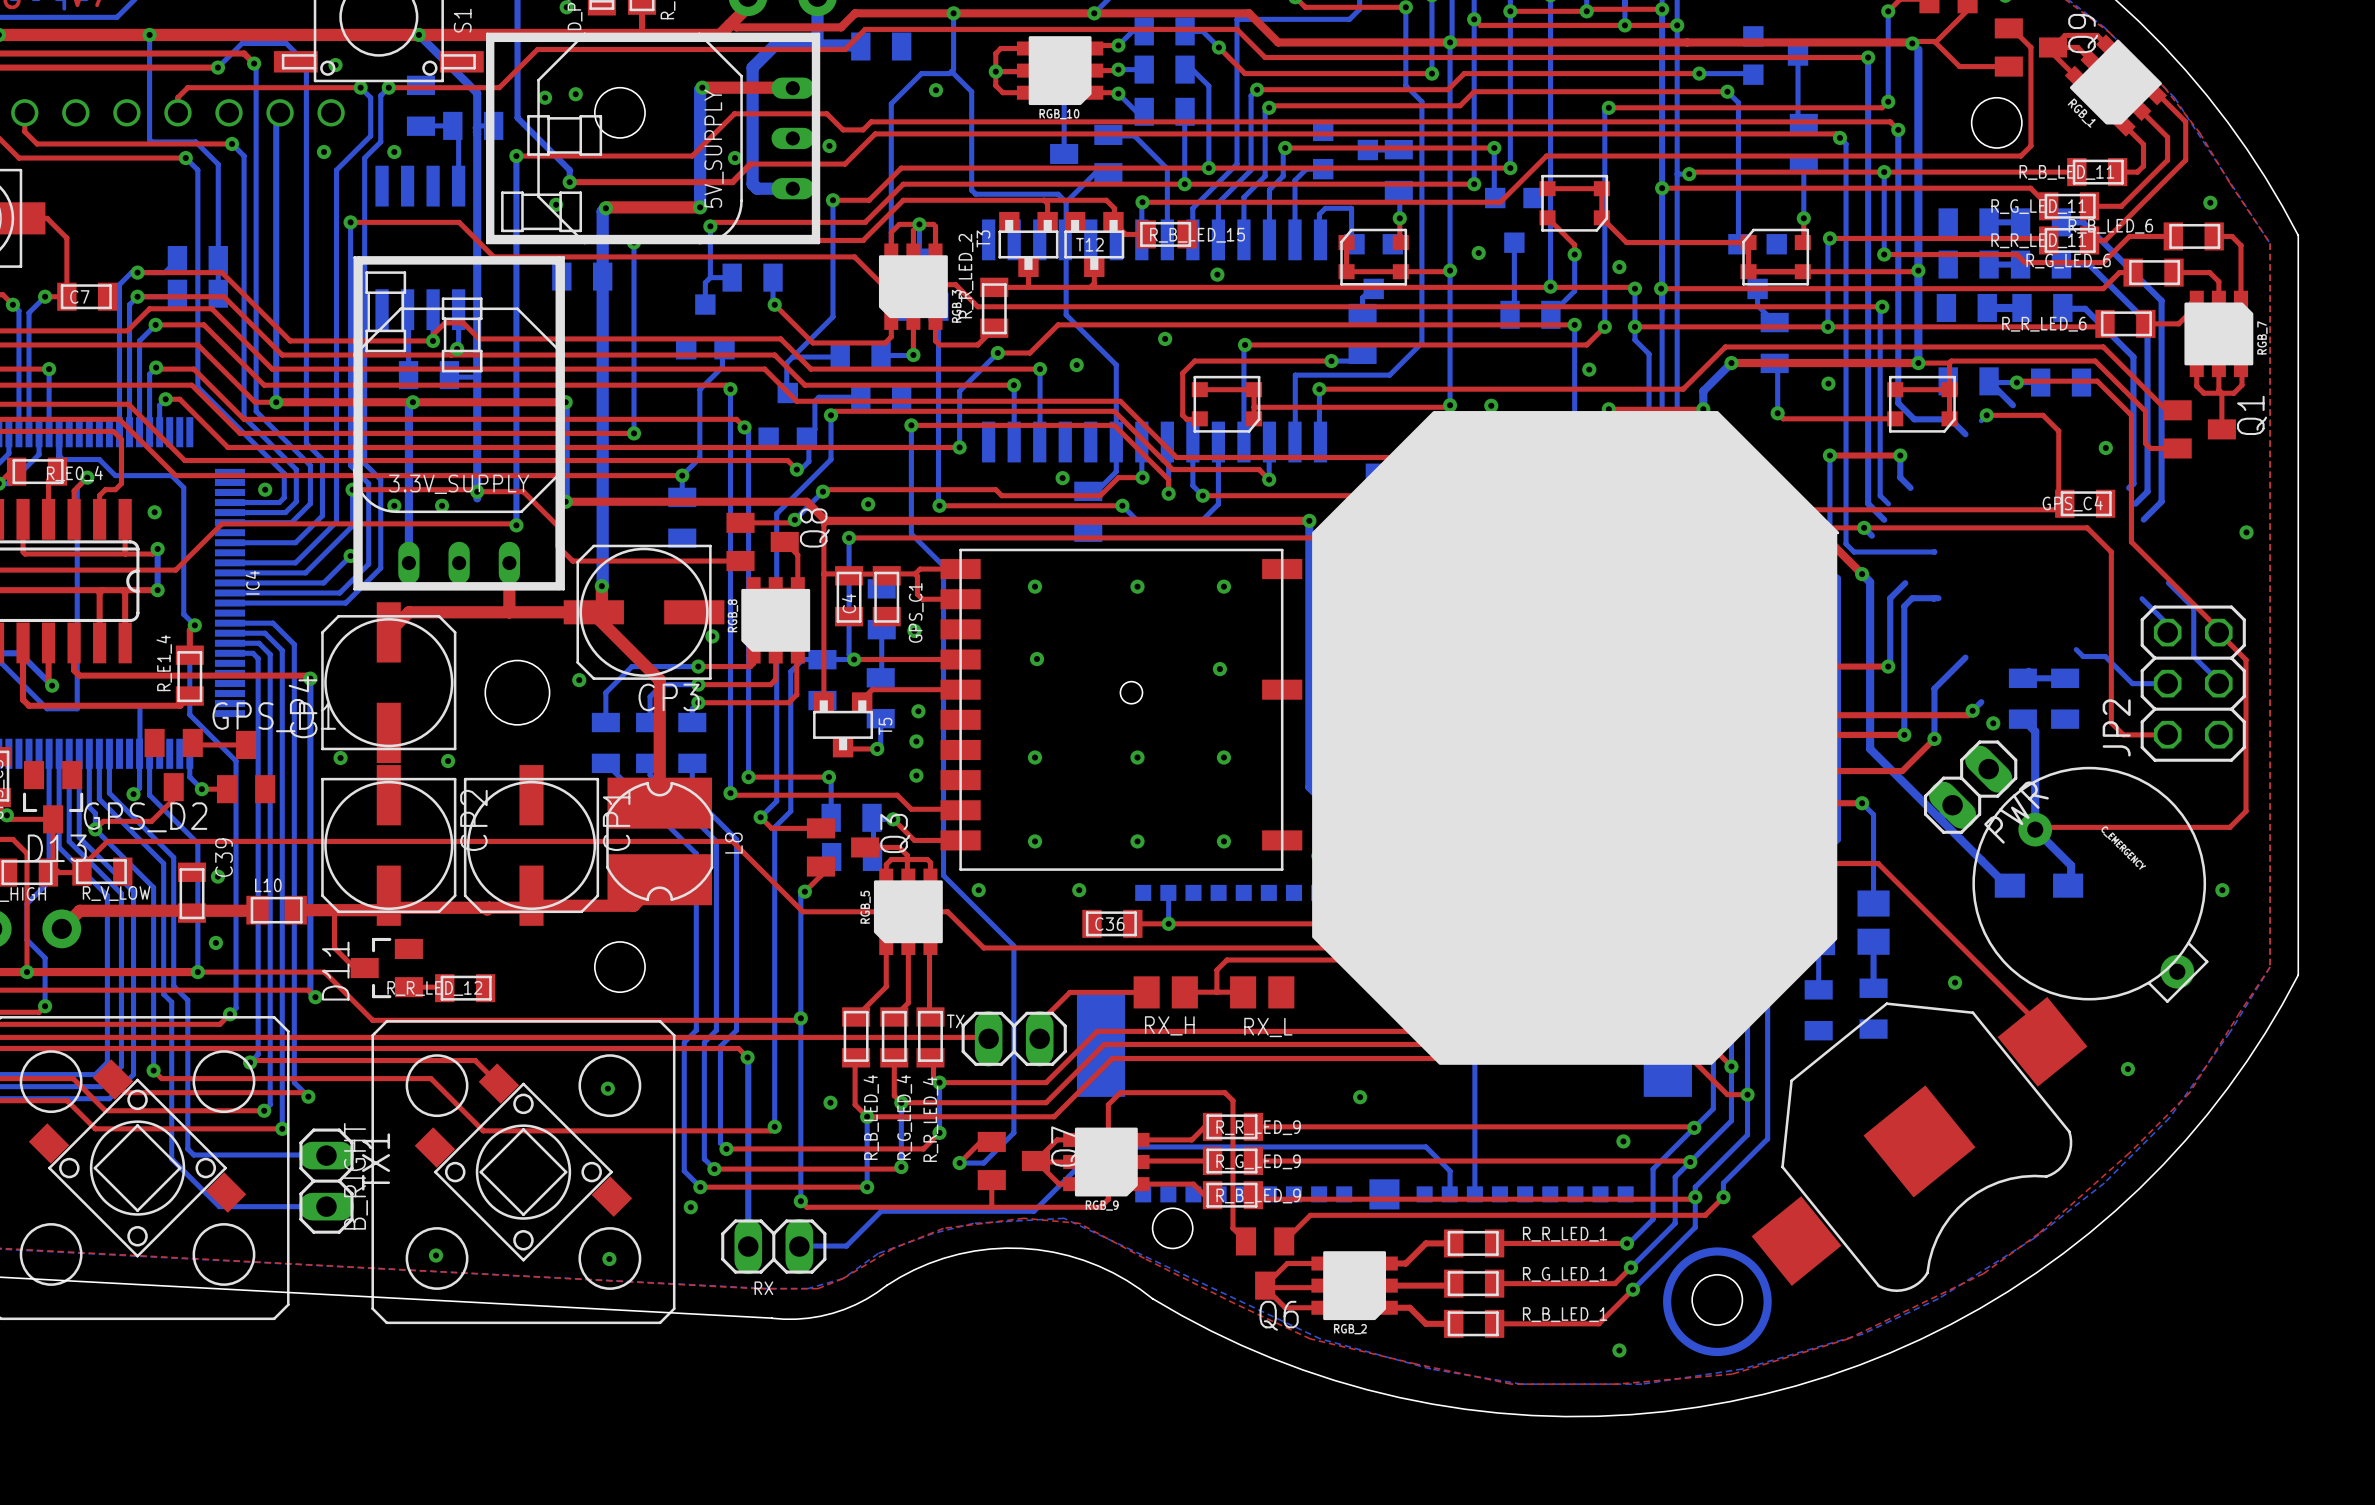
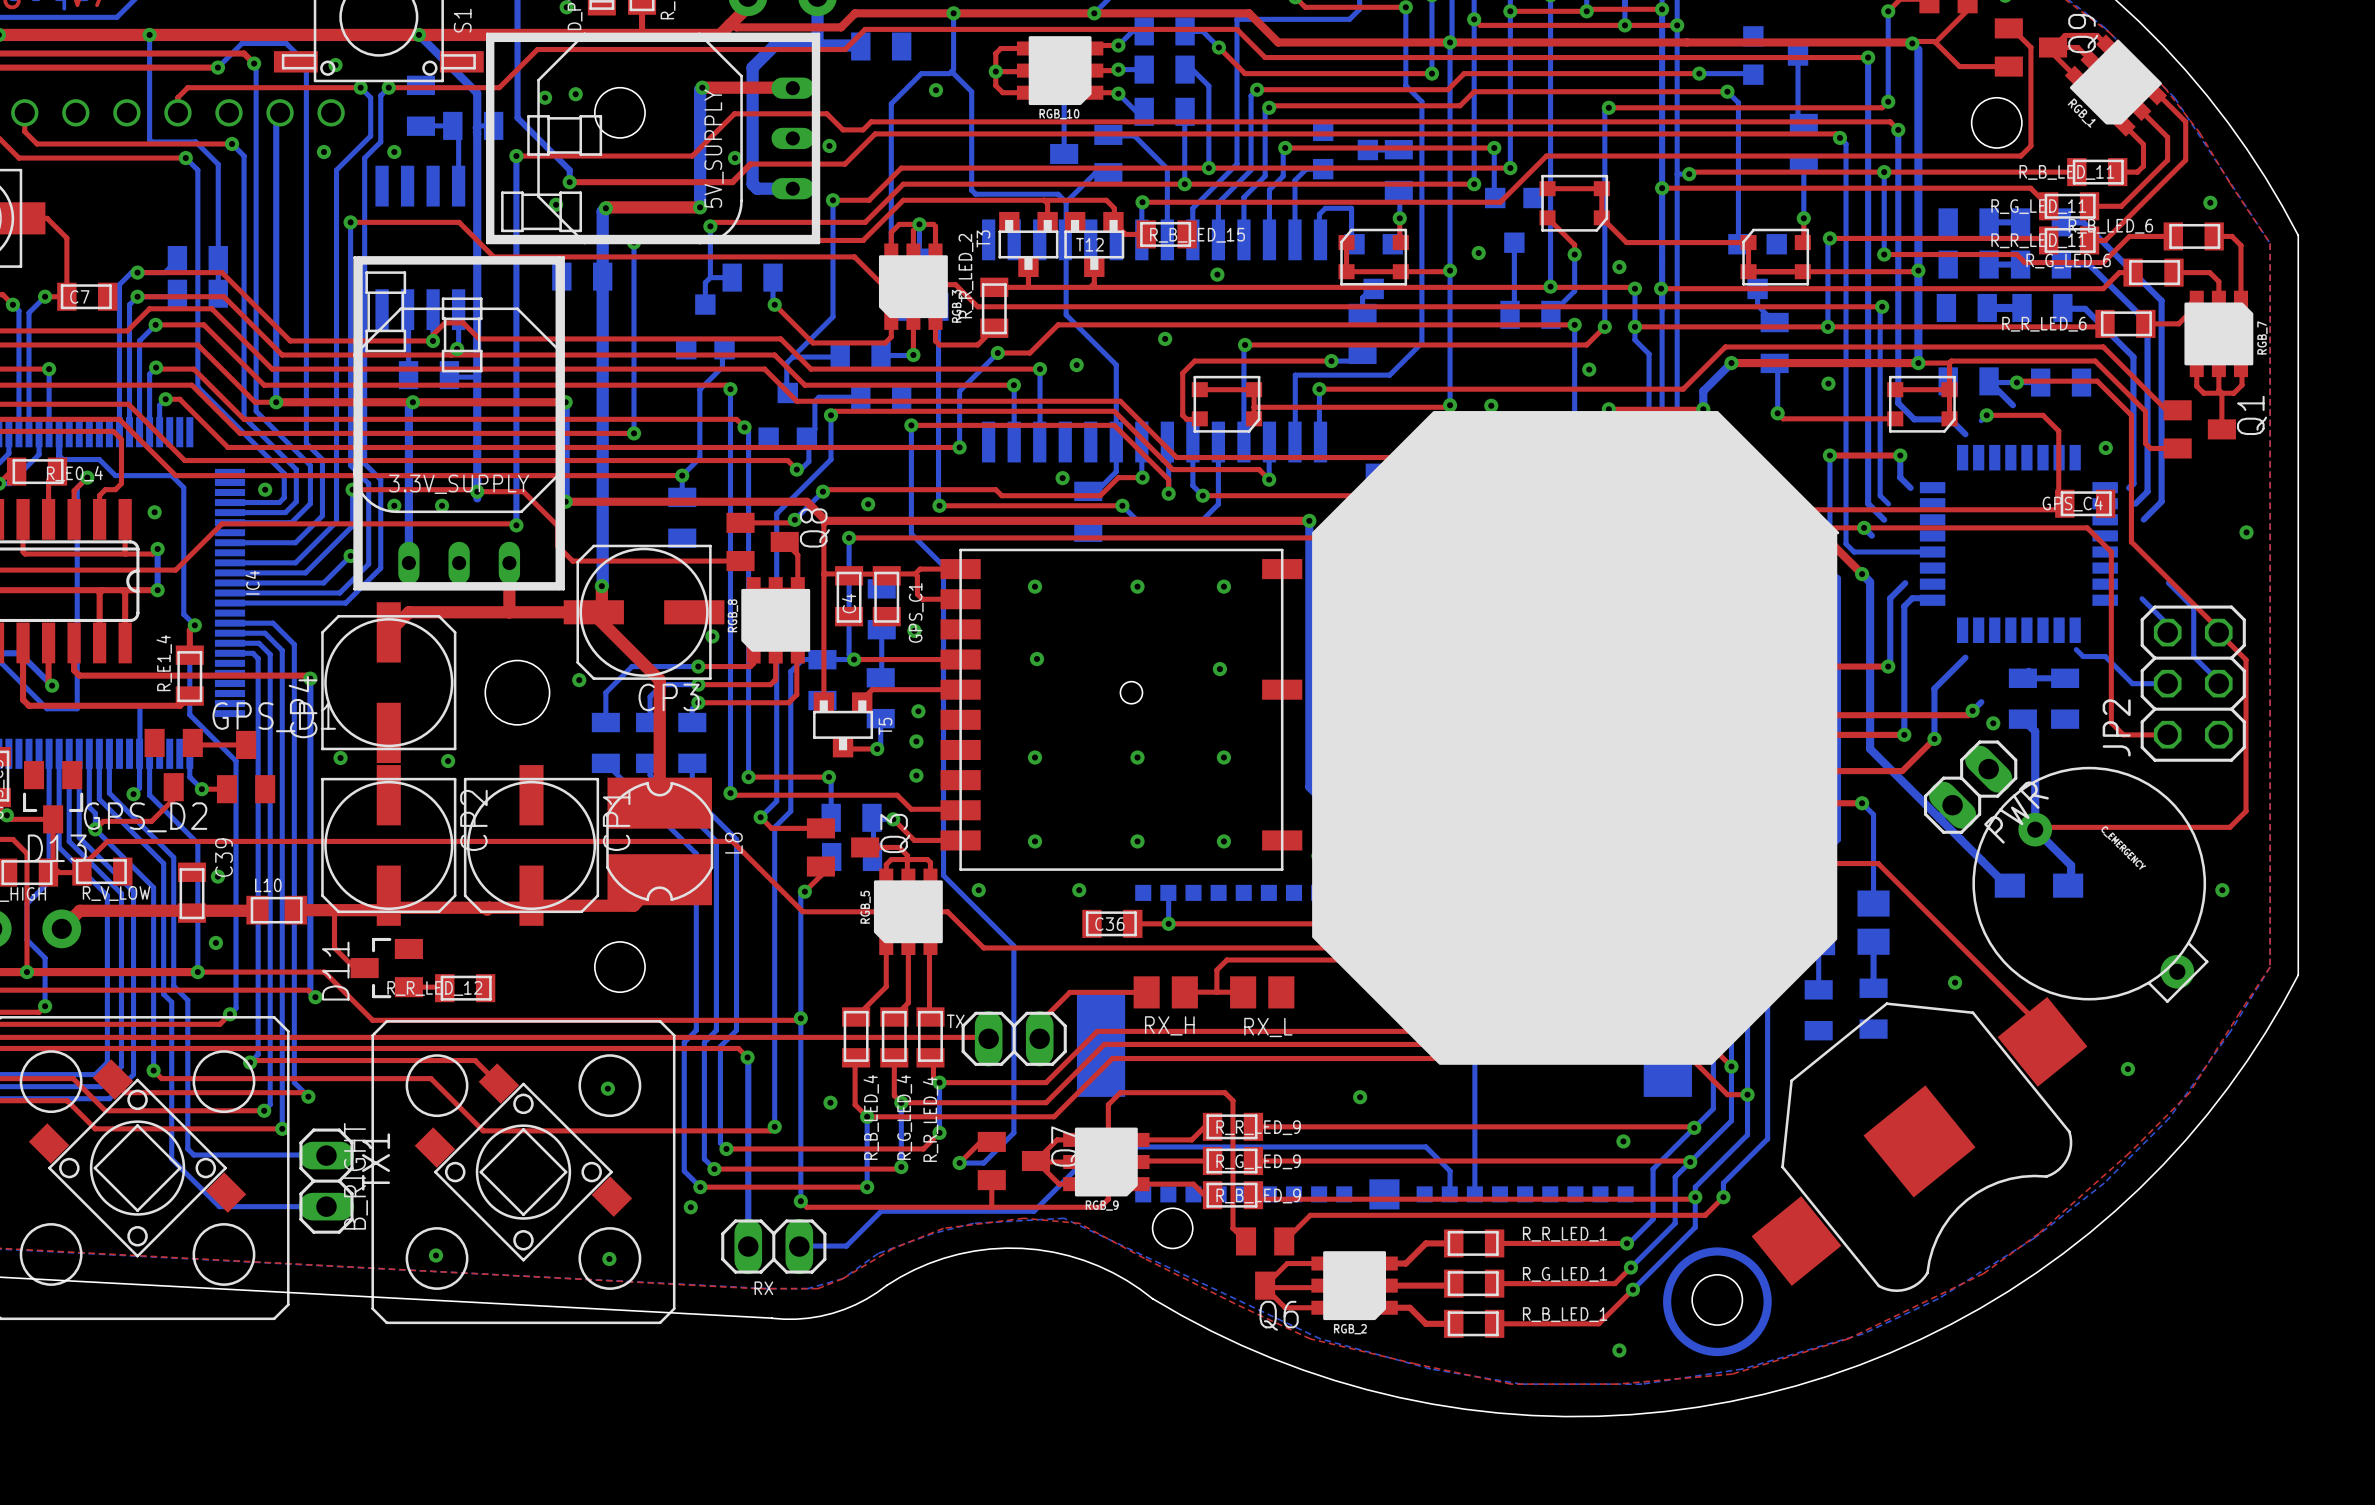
part: none -> (2018, 543)

